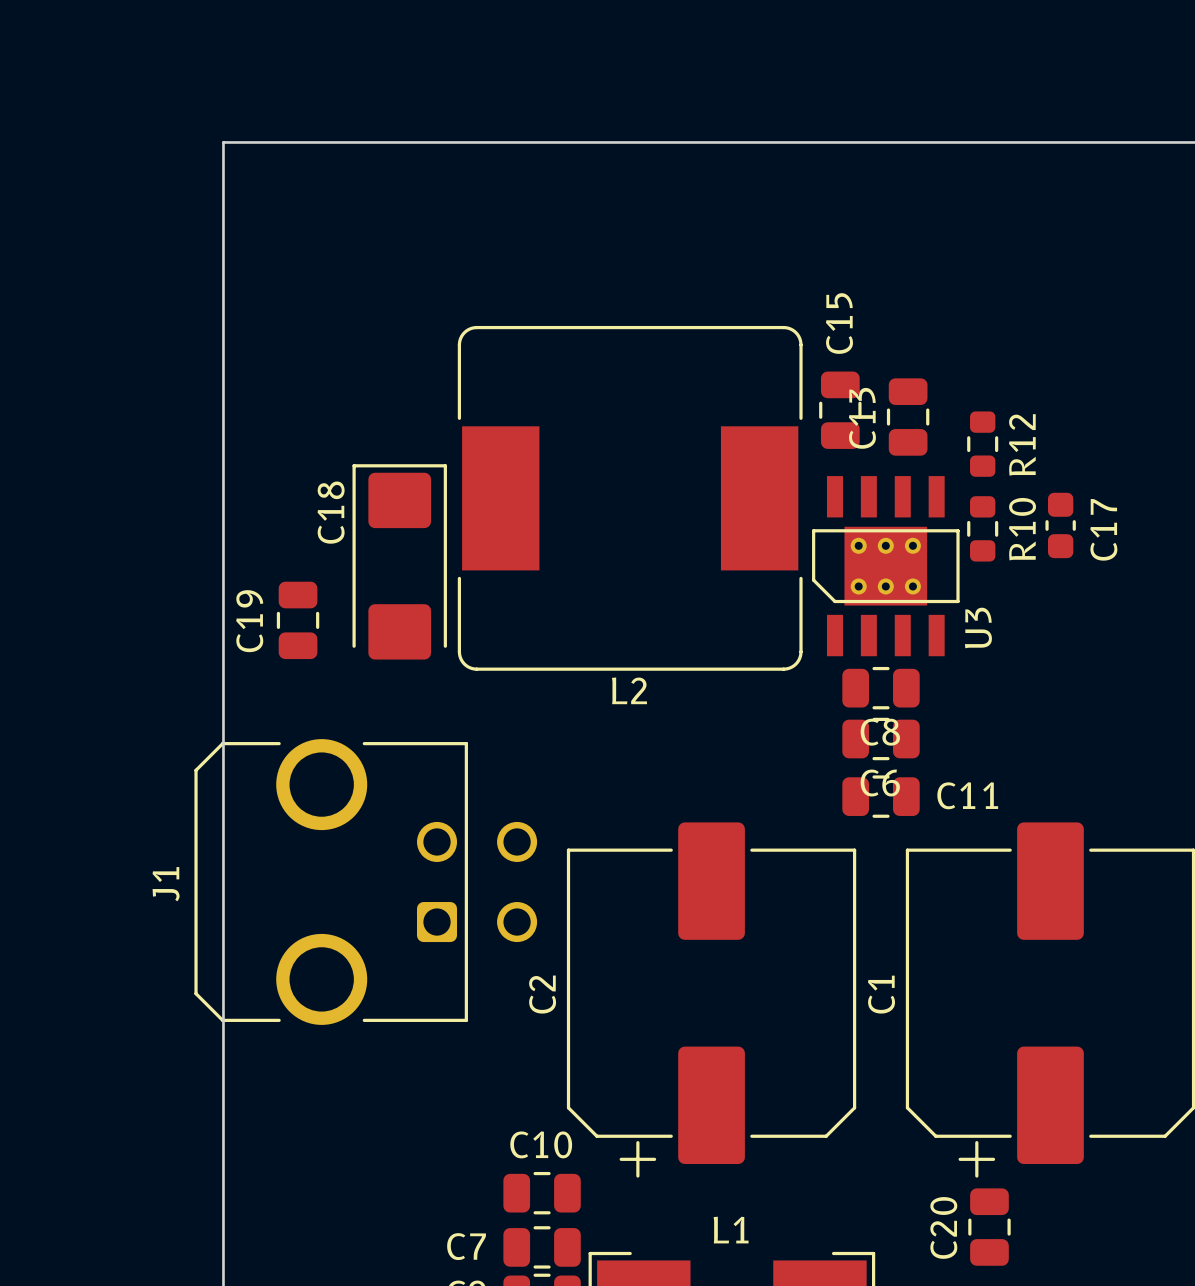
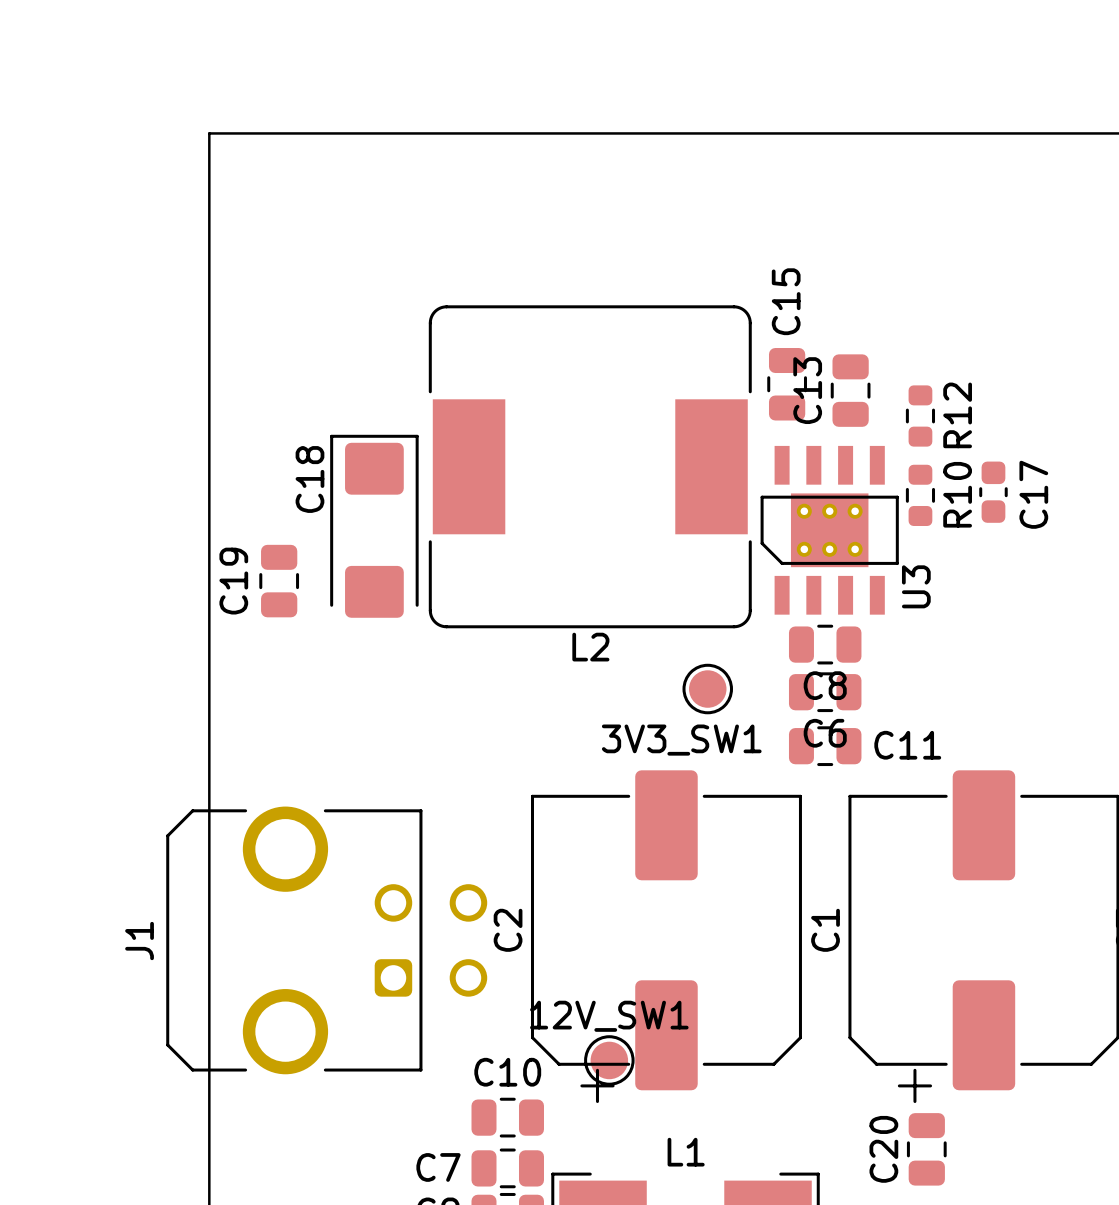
3V3_SW1: none -> (707, 689)
J1 position: (365, 882) -> (326, 940)
12V_SW1: none -> (609, 1060)

